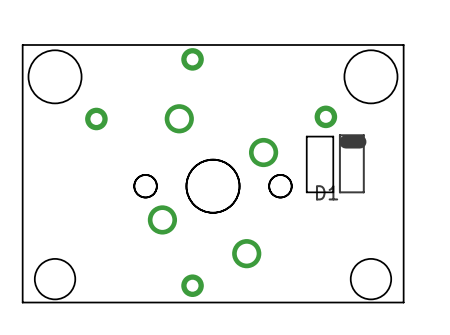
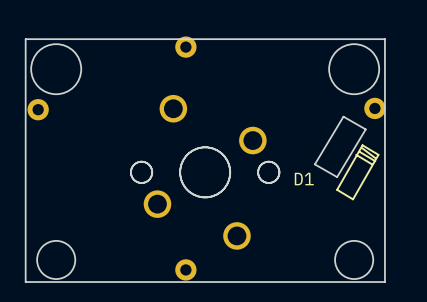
D1 footprint: [85, 48, 338, 298] -> [27, 36, 386, 281]
board edge: none -> (343, 116) (314, 164) (337, 177) (365, 129) (343, 116)
line: (339, 135) (363, 135) (363, 192) (339, 192) (339, 135) -> none
board edge: (306, 136) (306, 192) (333, 192) (333, 136) (306, 136) -> none
line: (345, 141) (359, 141) -> none
line: none -> (362, 145) (378, 154) (353, 199) (337, 189) (362, 145)
line: none -> (362, 148) (375, 158)
line: none -> (359, 151) (375, 161)
line: none -> (356, 154) (372, 164)

